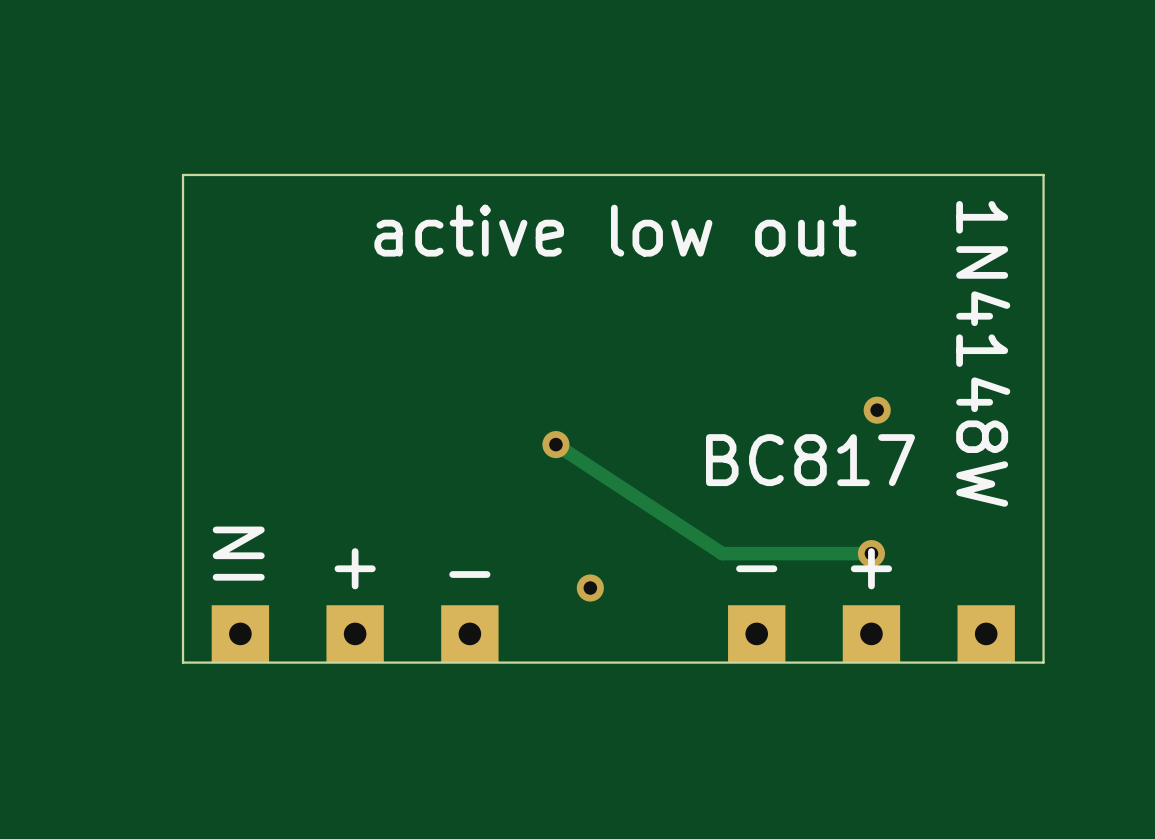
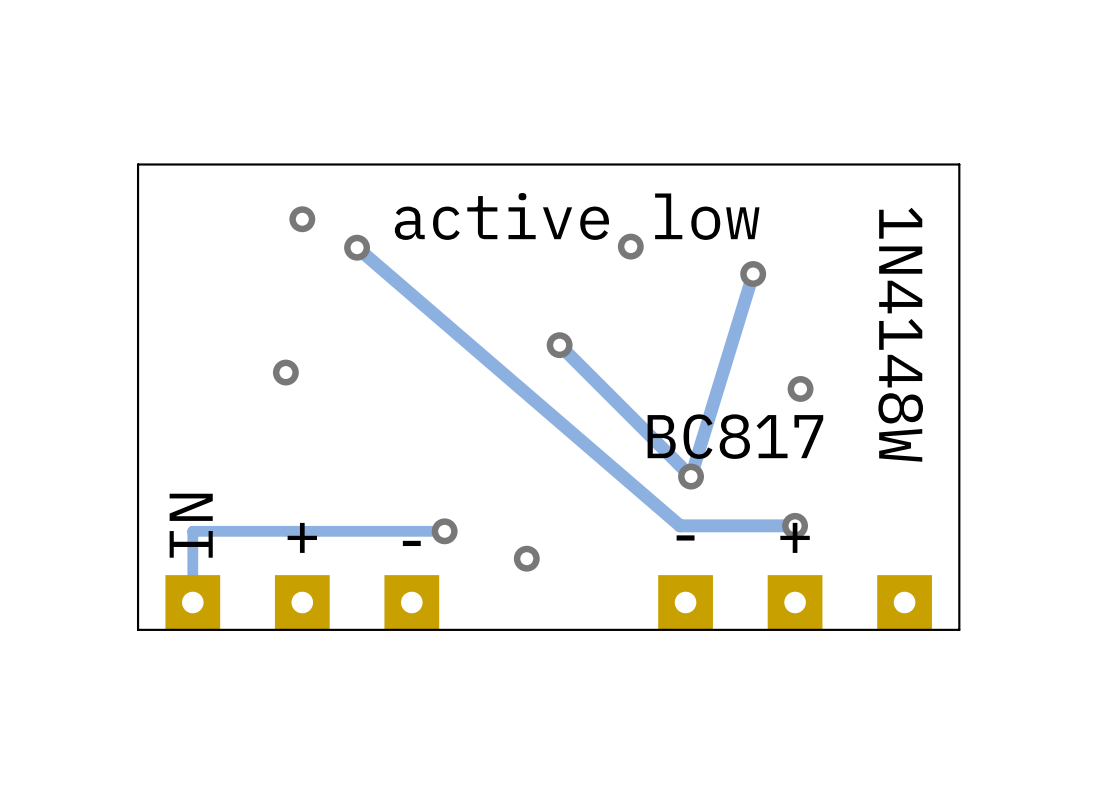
text: active low out (615, 230) -> active low (577, 216)
via: none -> (302, 219)
via: none -> (630, 246)
via: none -> (357, 247)
track: none -> (753, 273) (691, 476) (559, 345)
via: none -> (753, 273)
via: none -> (559, 345)
via: none -> (285, 372)
track: (555, 444) (722, 553) (750, 553) -> (357, 247) (680, 525)
via: (555, 444) -> none
via: none -> (691, 476)
track: none -> (444, 531) (192, 531) (192, 597)
via: none -> (444, 531)

